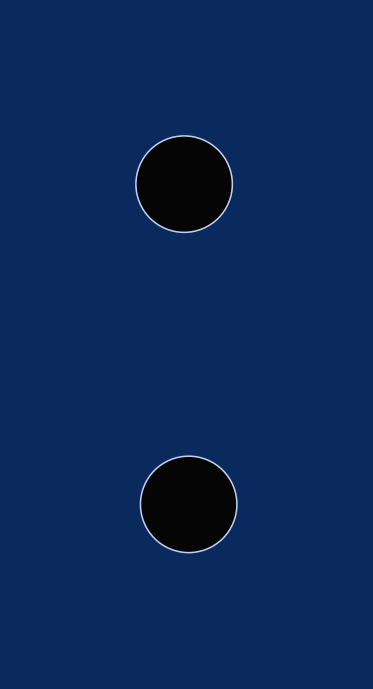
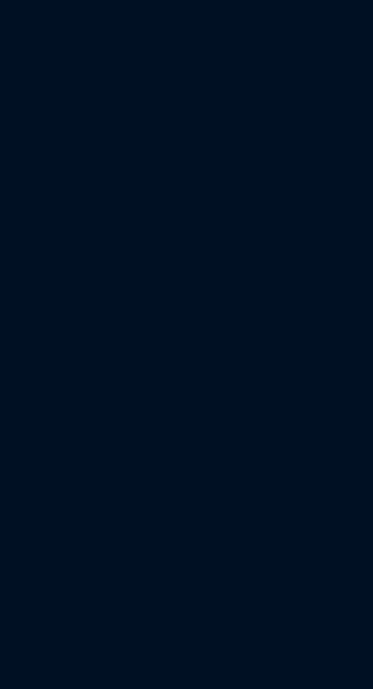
part: (184, 184) -> none
part: (188, 504) -> none

